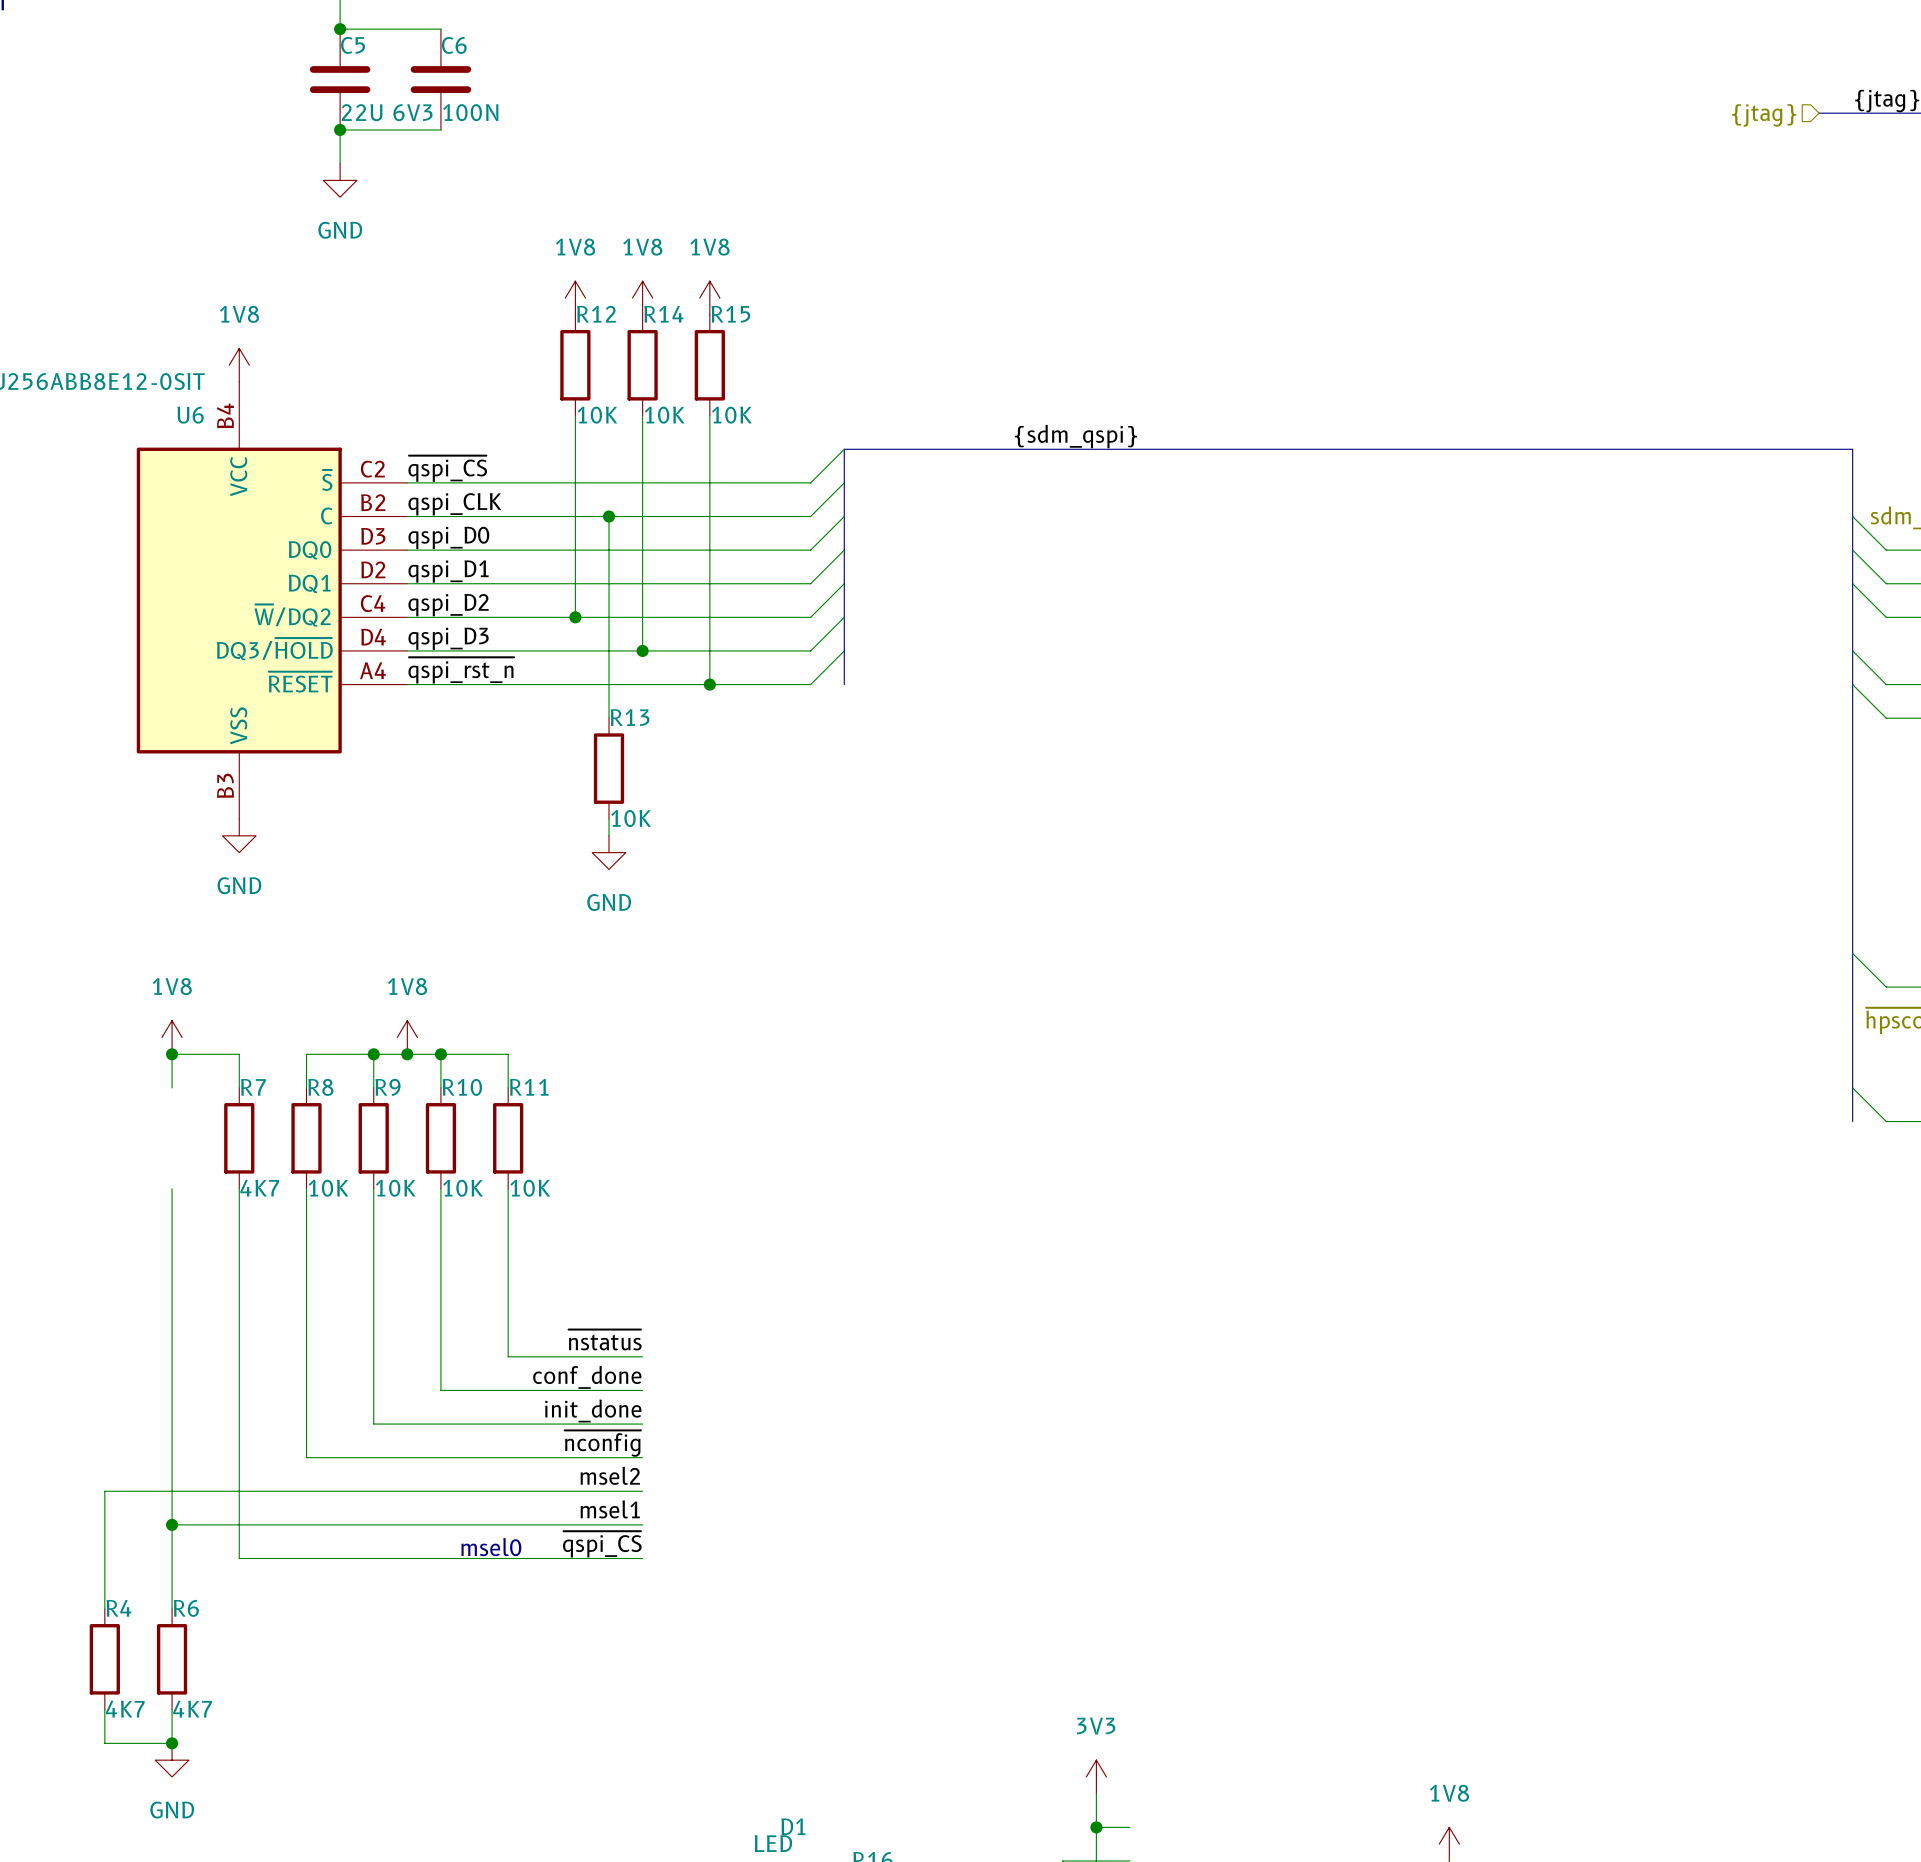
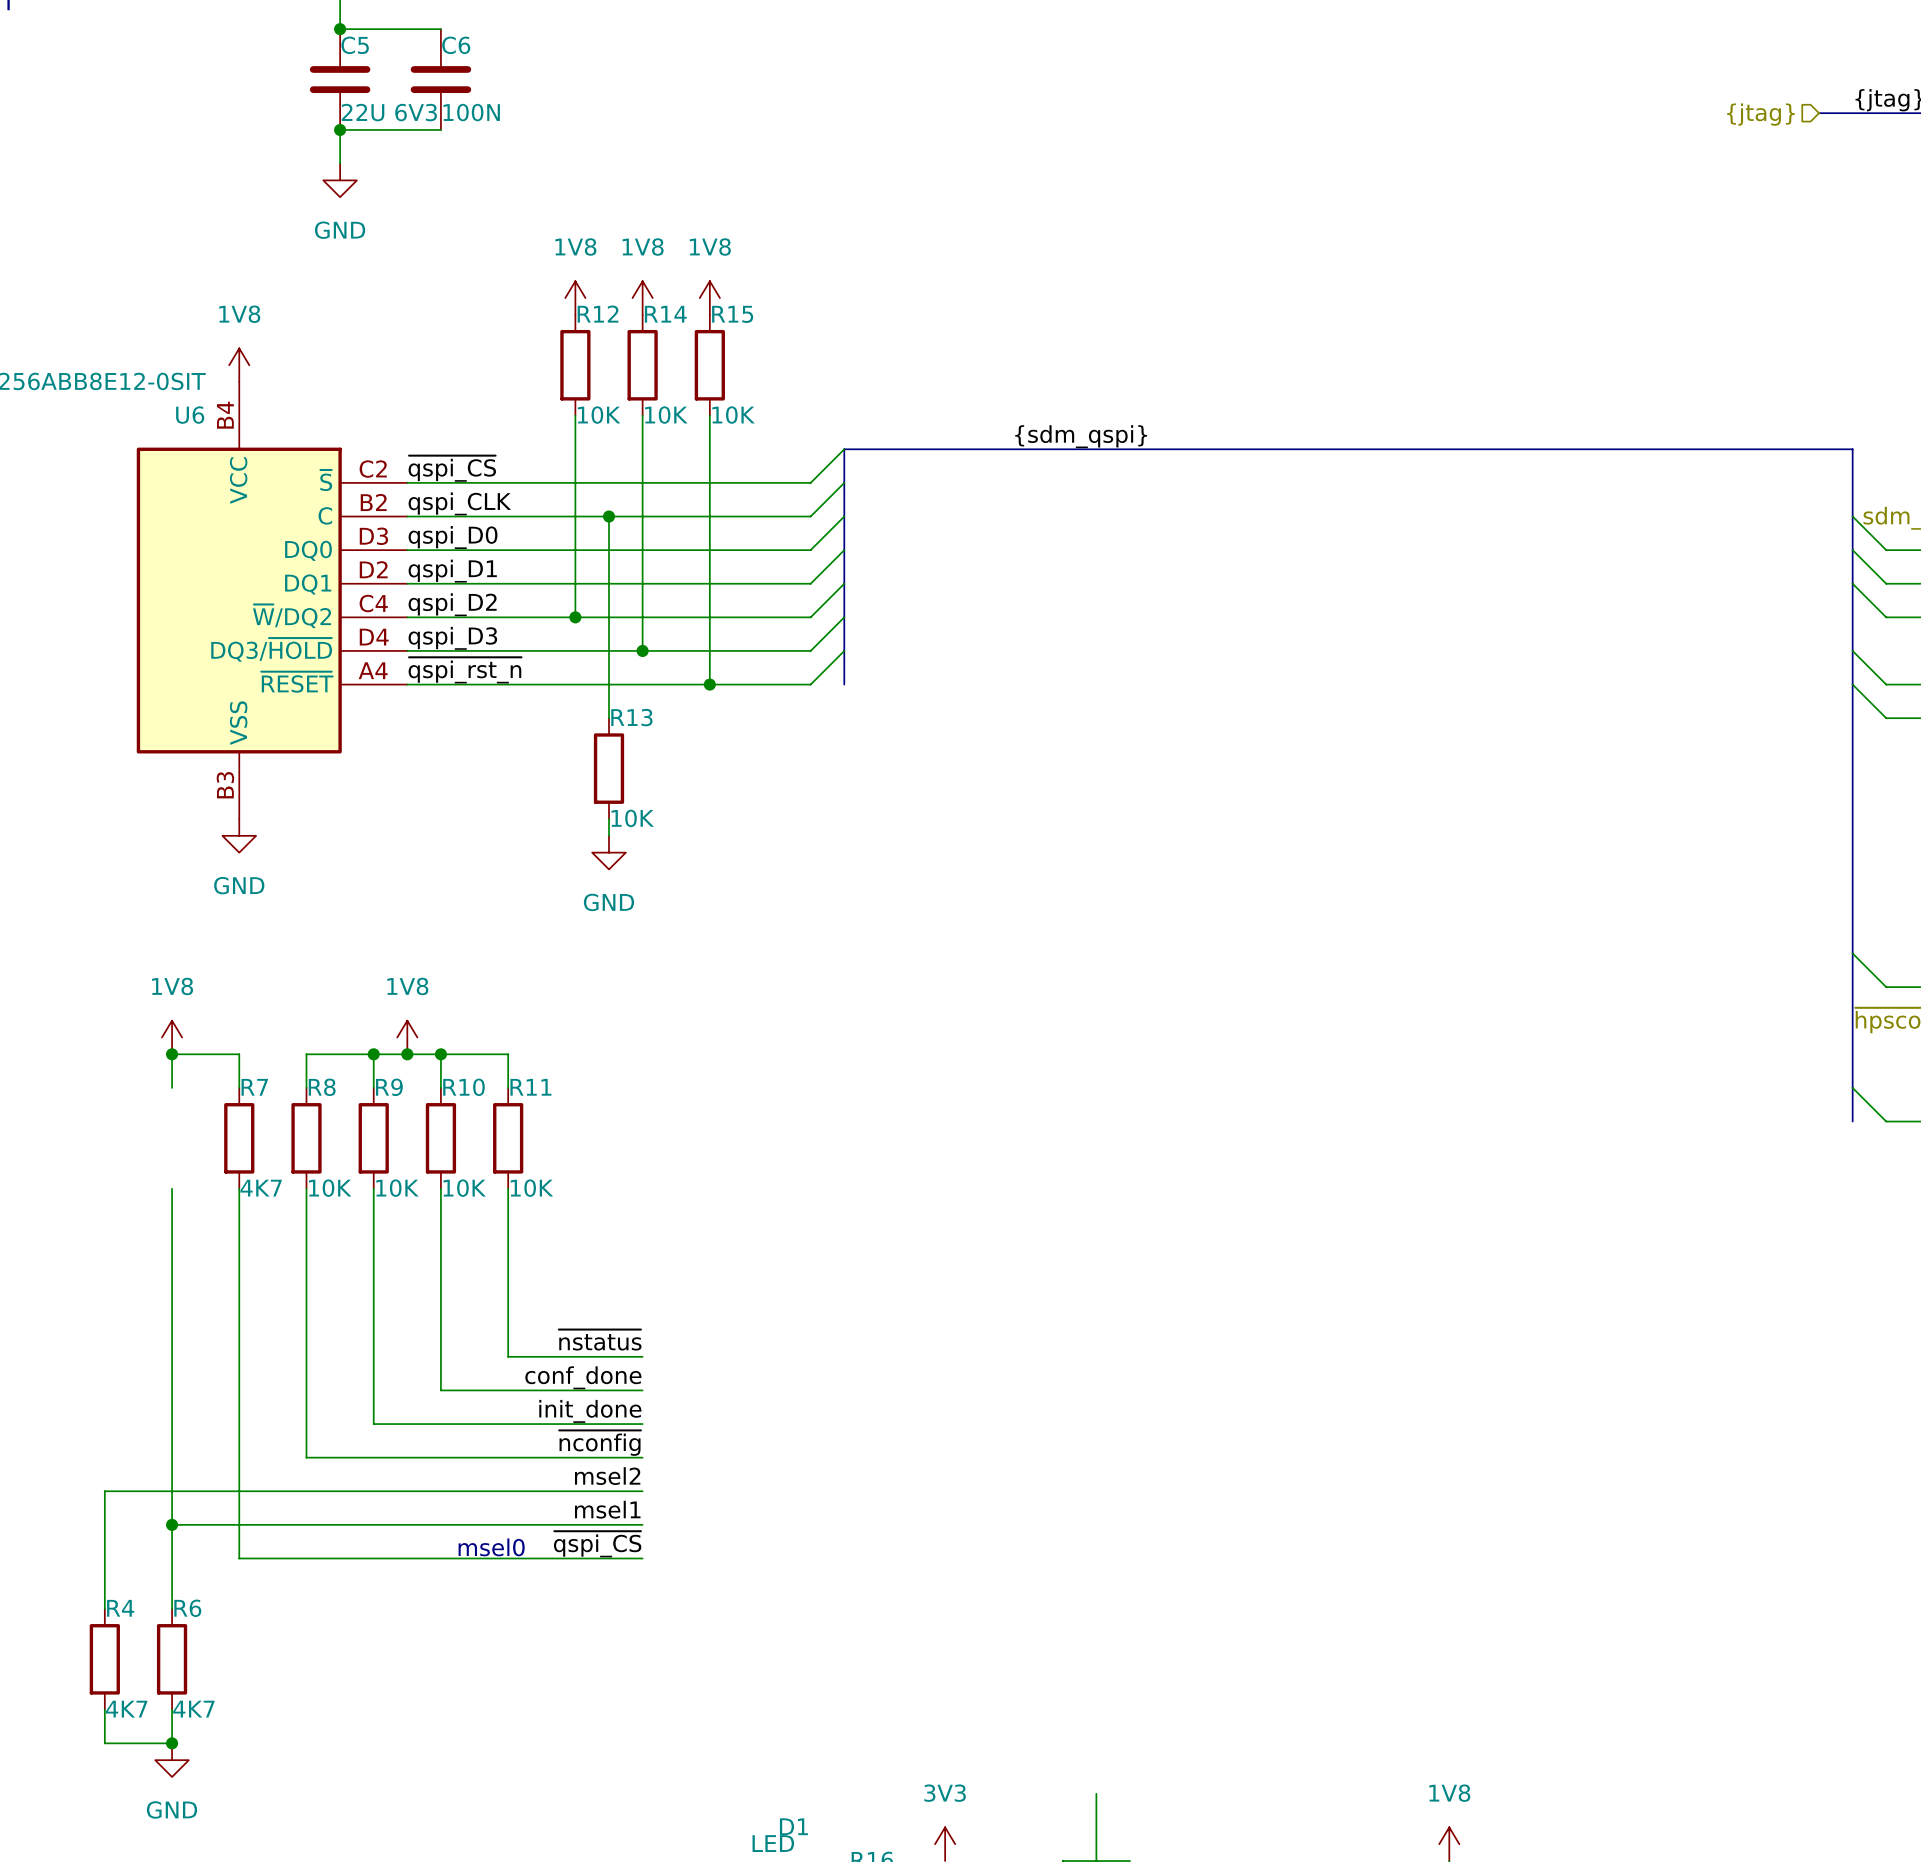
power symbol position: 3V3 (1096, 1776) -> 3V3 (945, 1844)
wire: (1096, 1827) (1129, 1827) -> none
junction: (1096, 1827) -> none

